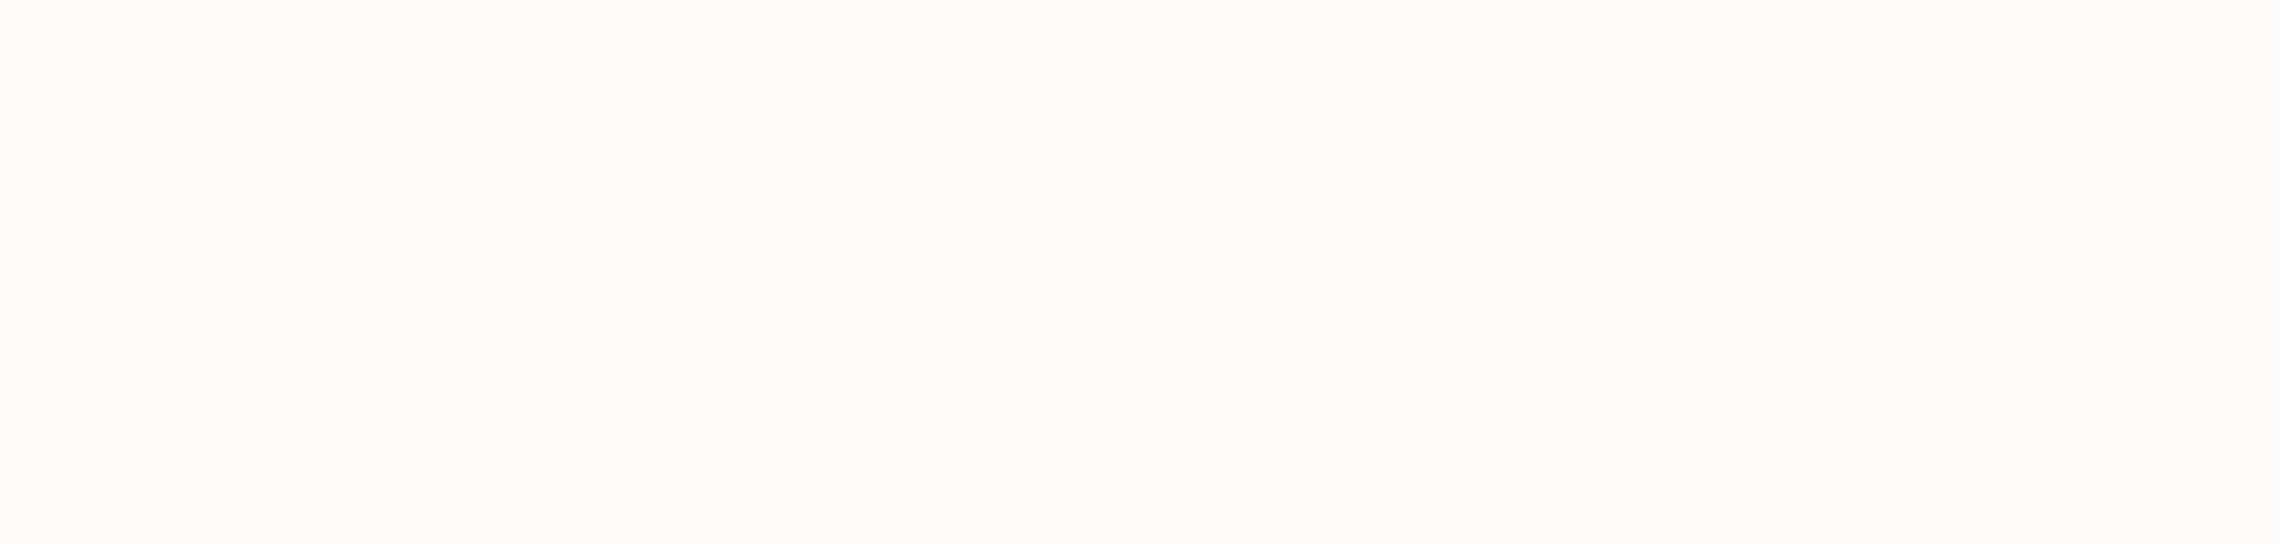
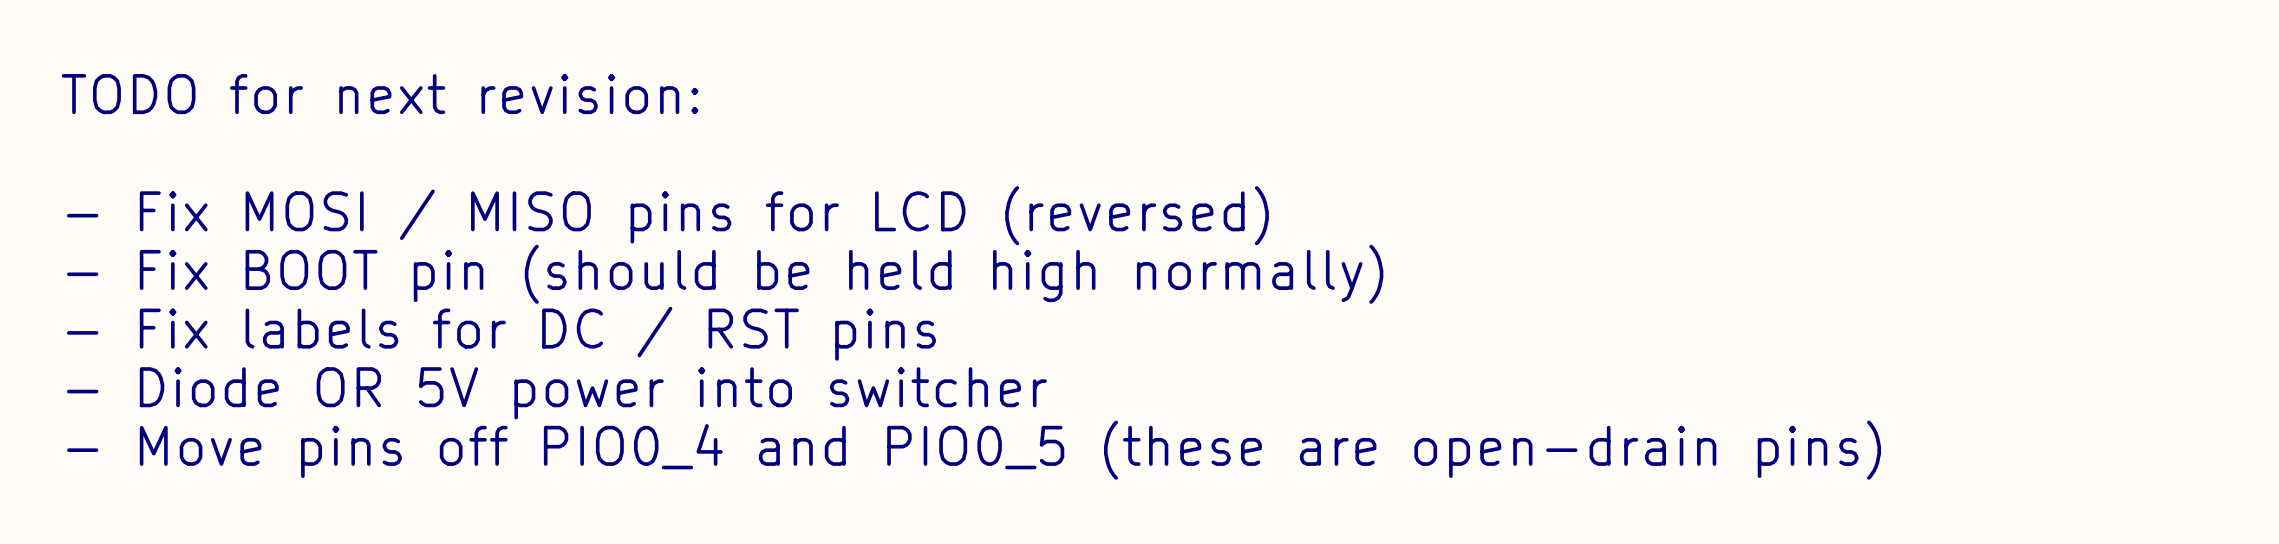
text: none -> TODO for next revision: (380, 94)
text: none -> - Fix MOSI / MISO pins for LCD (reversed) (667, 215)
text: none -> - Fix BOOT pin (should be held high normally) (725, 274)
text: none -> - Fix labels for DC / RST pins (501, 333)
text: none -> - Diode OR 5V power into switcher (556, 393)
text: none -> - Move pins off PIO0_4 and PIO0_5 (these are open-drain pins) (974, 450)

